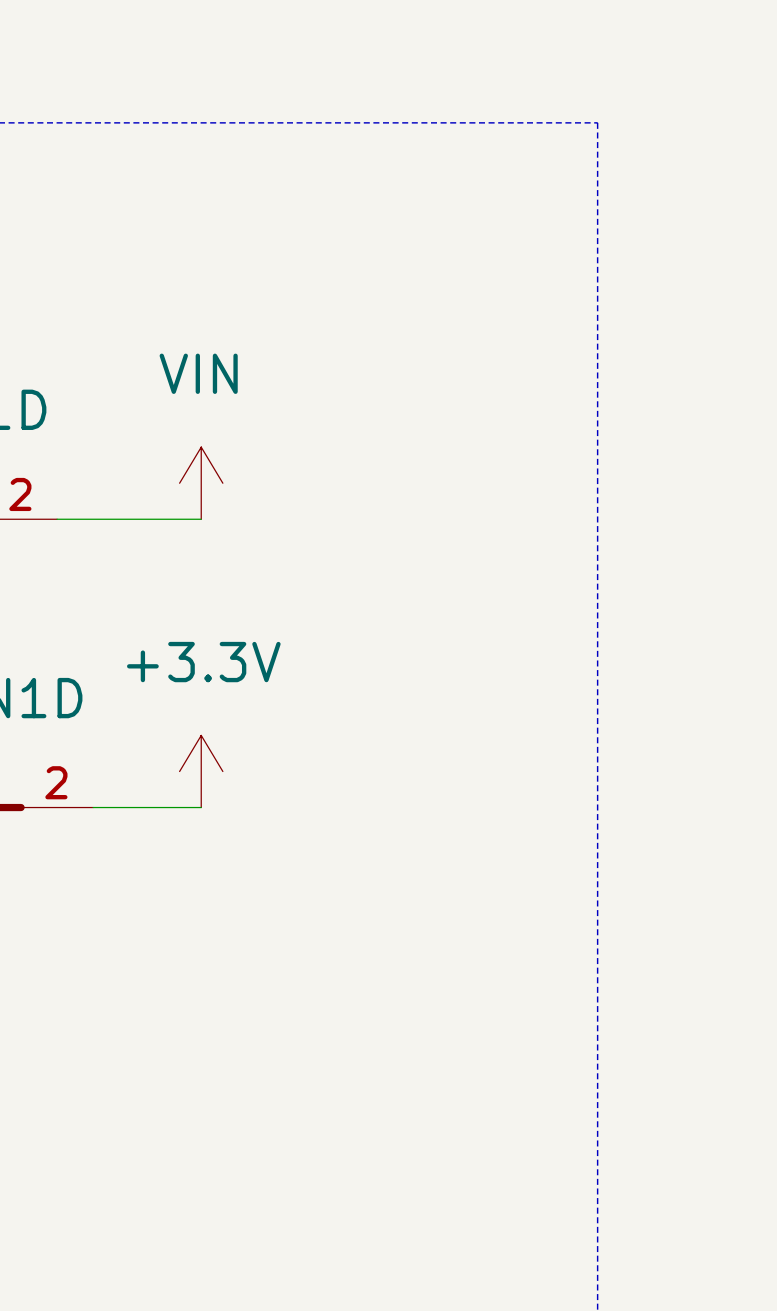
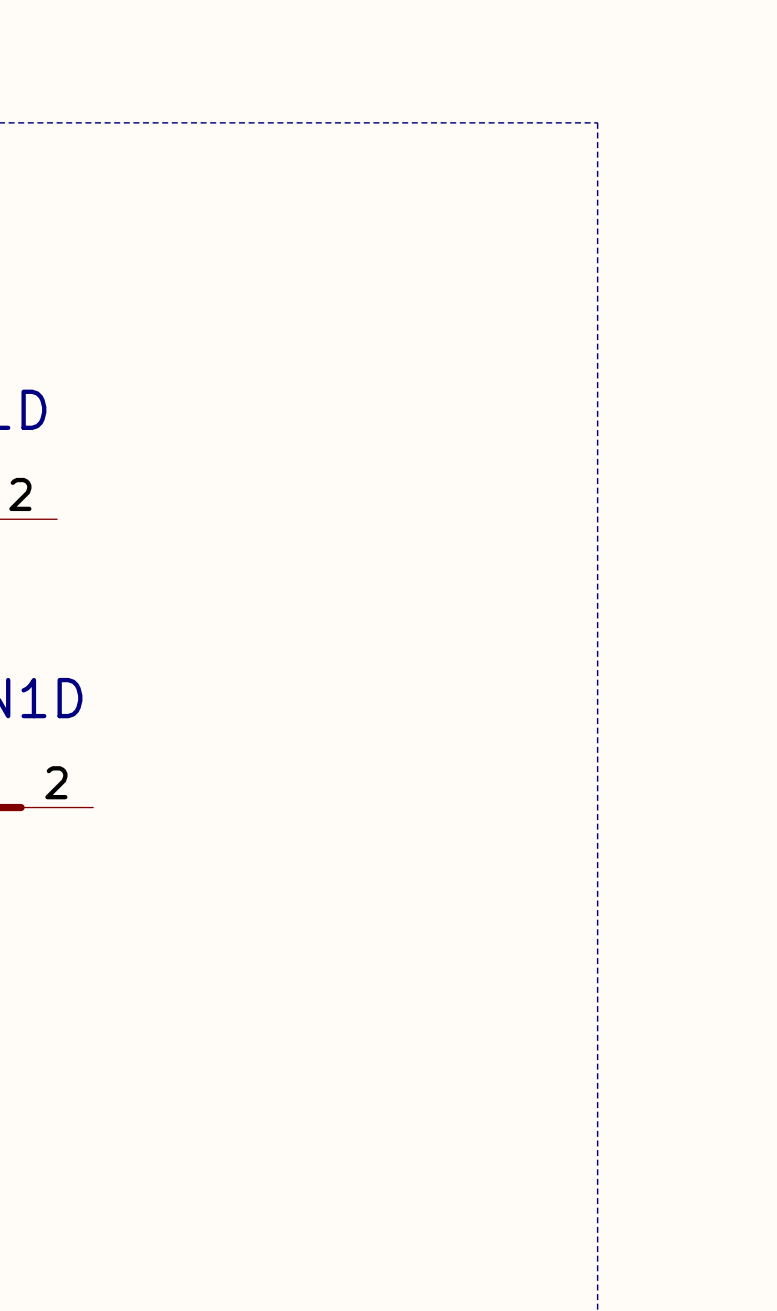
power symbol: VIN (201, 483) -> none
wire: (57, 519) (201, 519) -> none
power symbol: +3.3V (201, 771) -> none
wire: (93, 807) (201, 807) -> none

